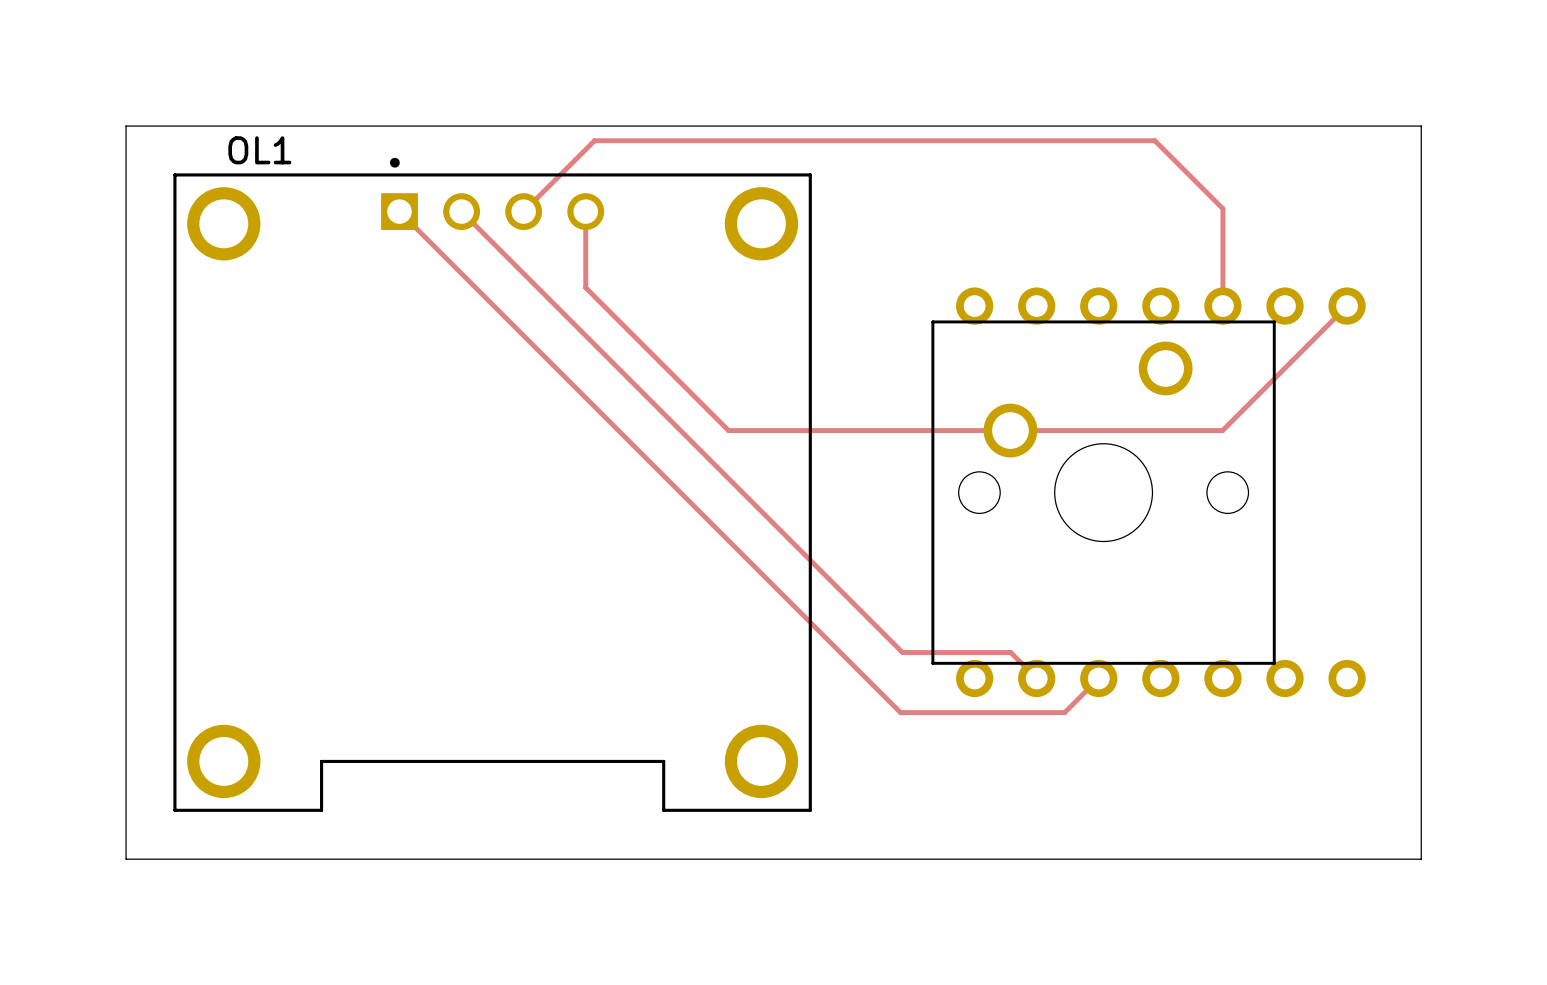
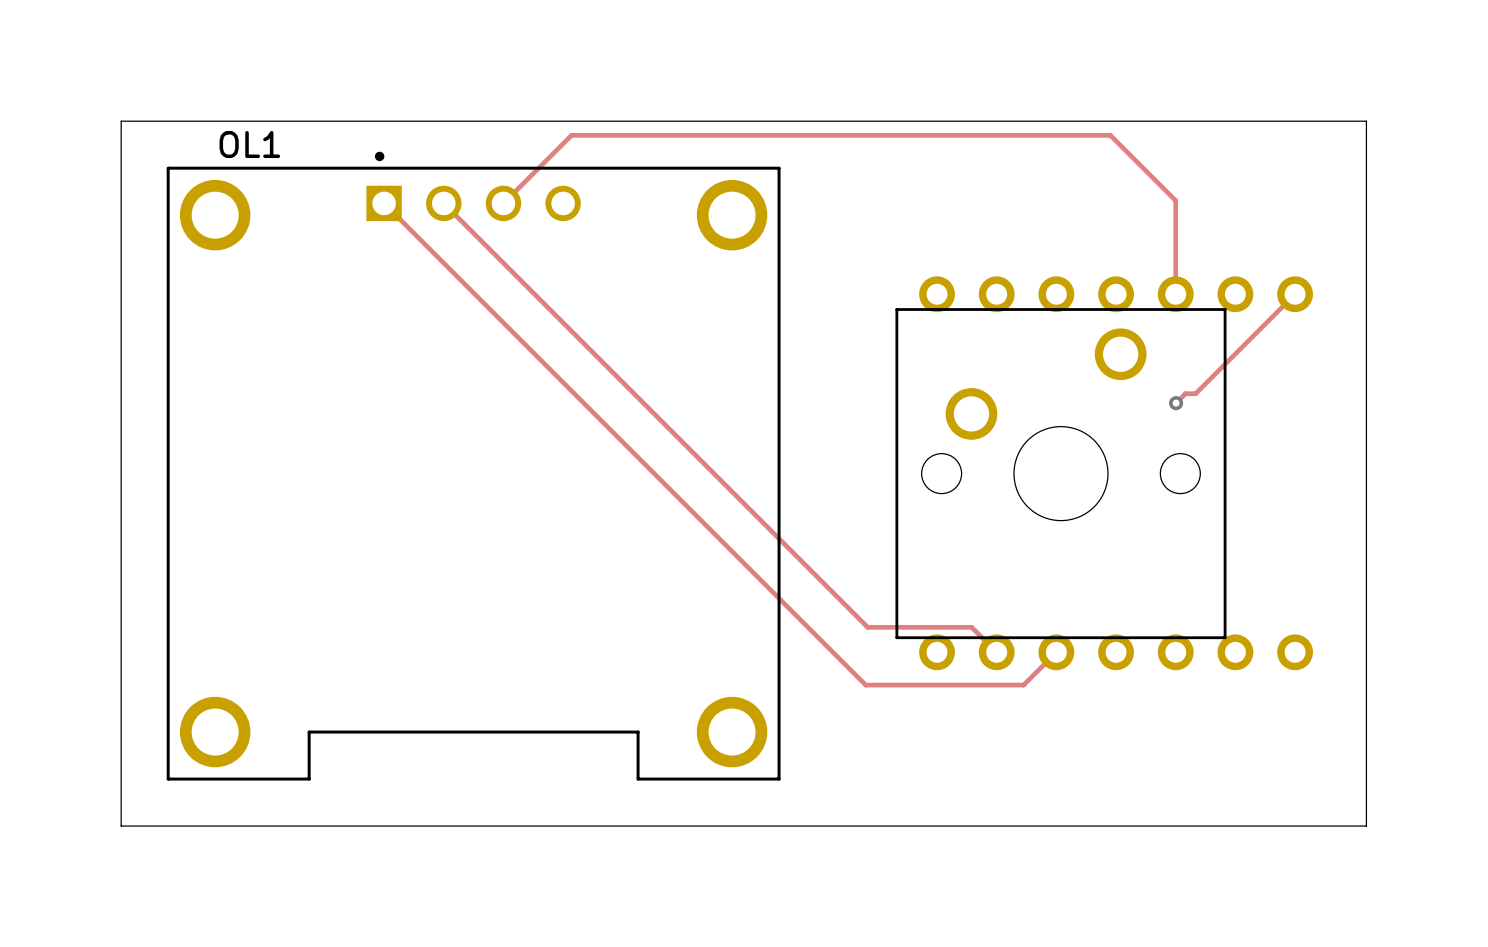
track: (585, 211) (585, 287) (728, 430) (1222, 430) (1243, 409) -> (1176, 403) (1185, 393) (1195, 393)
via: none -> (1176, 403)

